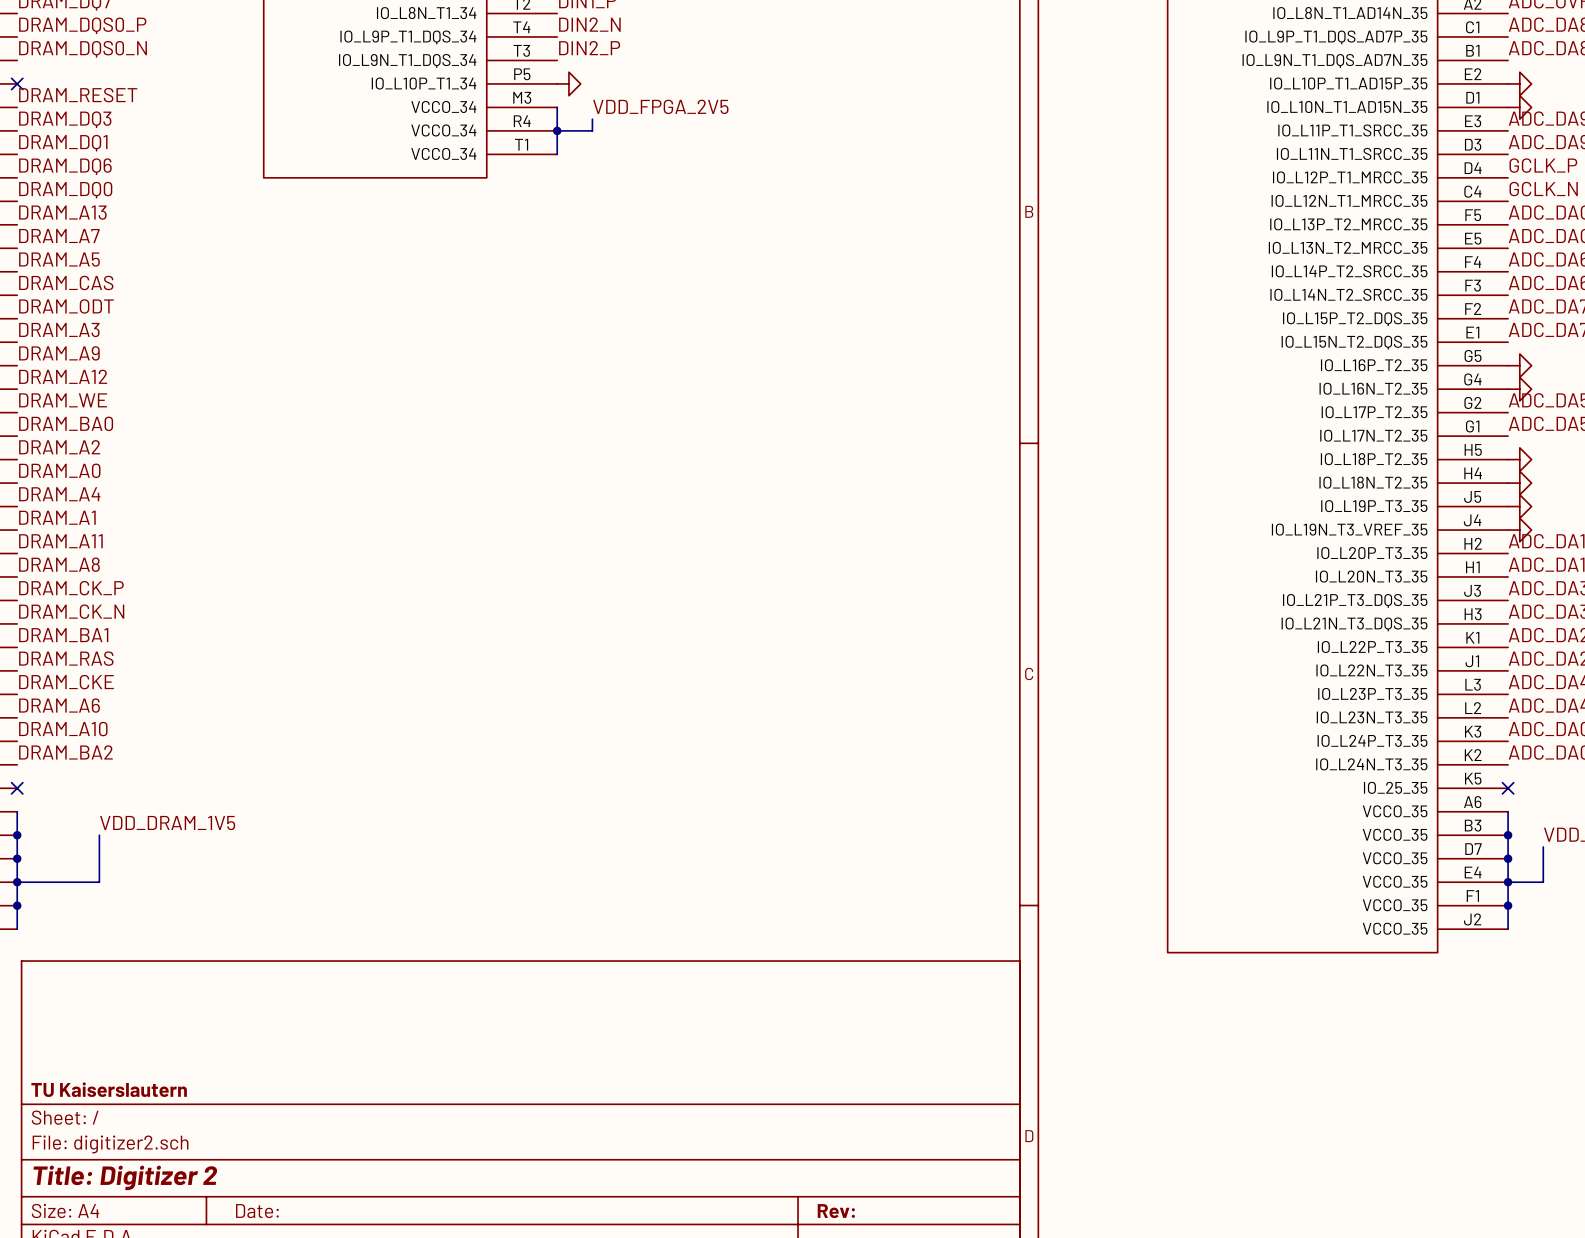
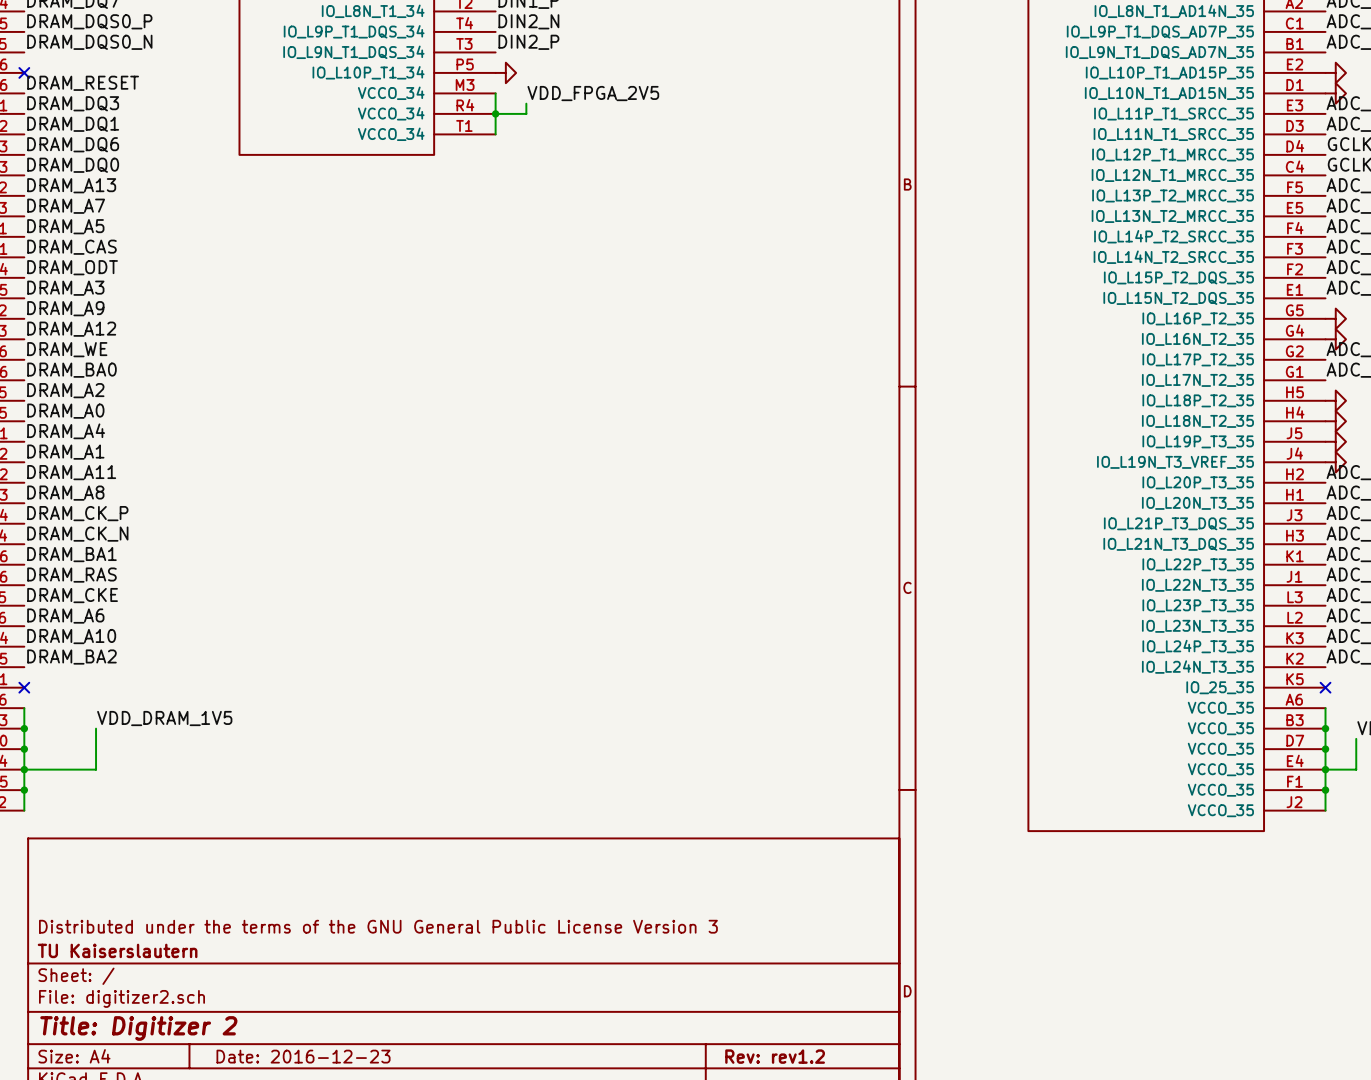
title block: none -> Distributed under the terms of the GNU General Public License Version 3 (378, 926)
title block: Date: (257, 1211) -> Date: 2016-12-23 (303, 1056)
title block: Rev: (836, 1211) -> Rev: rev1.2 (775, 1056)

